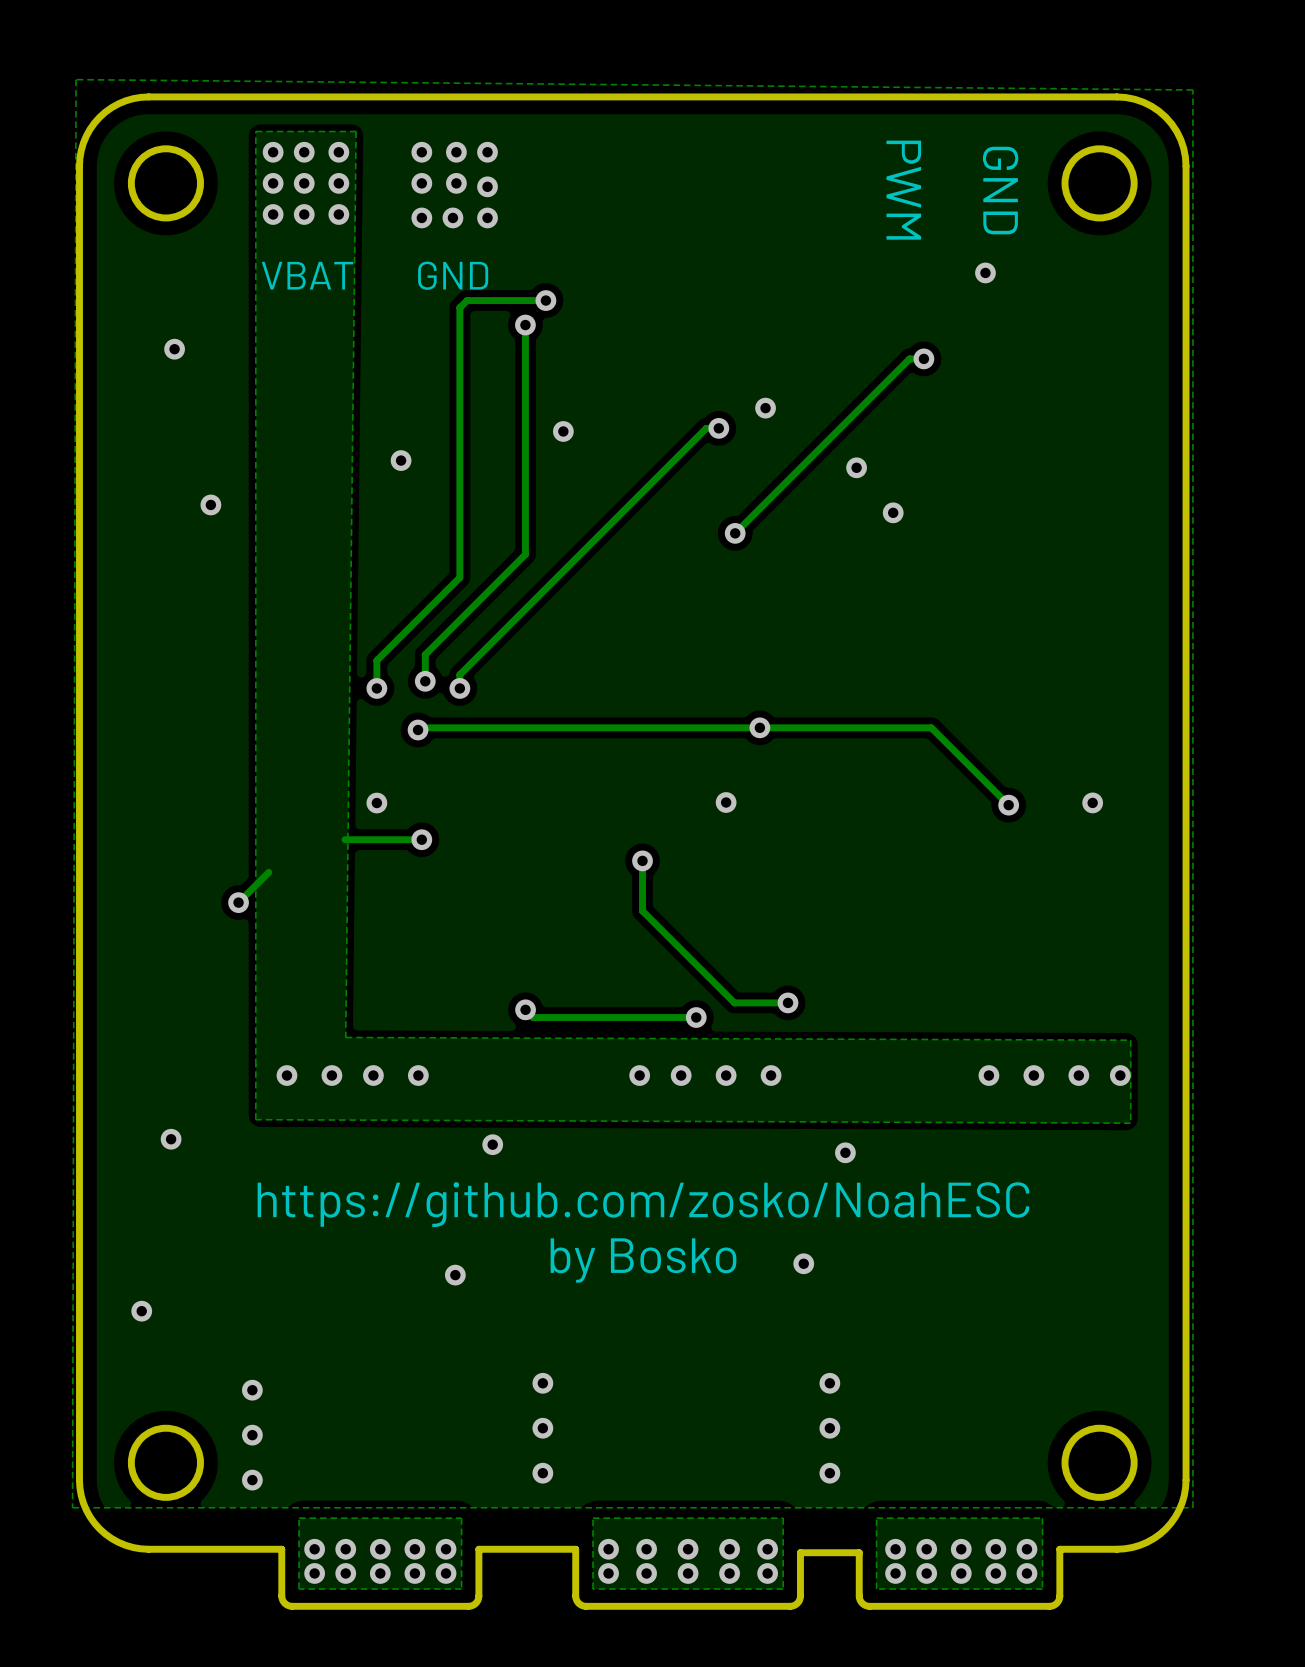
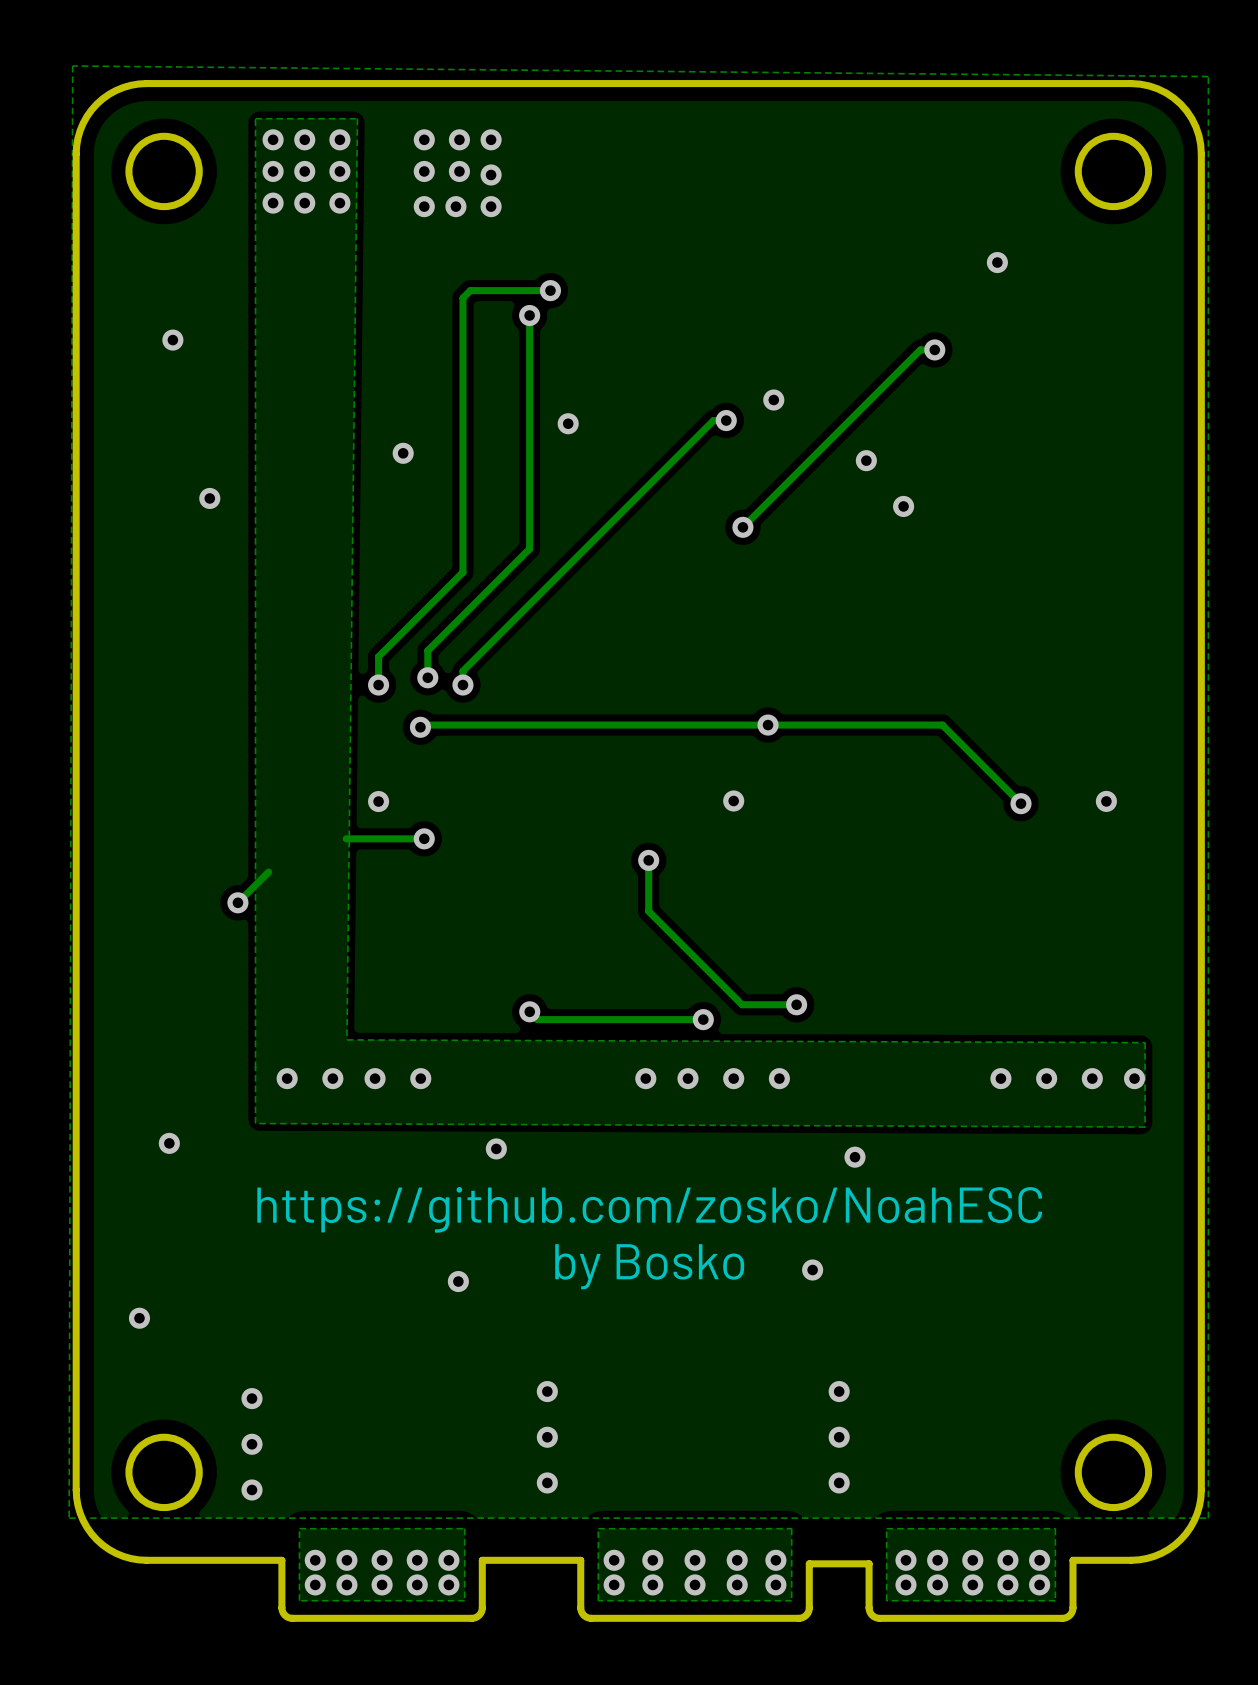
PWM: (903, 190) -> none
GND: (1000, 190) -> none
part: VBAT (307, 275) -> none
part: GND (453, 275) -> none

